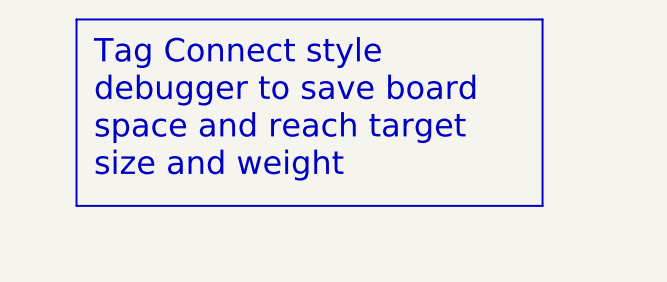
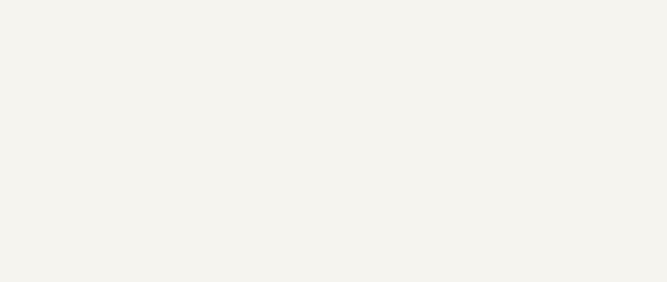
line: (76, 19) (542, 19) (542, 205) (76, 205) (76, 19) -> none
text: Tag Connect style (237, 52) -> none
text: debugger to save board (285, 90) -> none
text: space and reach target (280, 127) -> none
text: size and weight (219, 165) -> none

